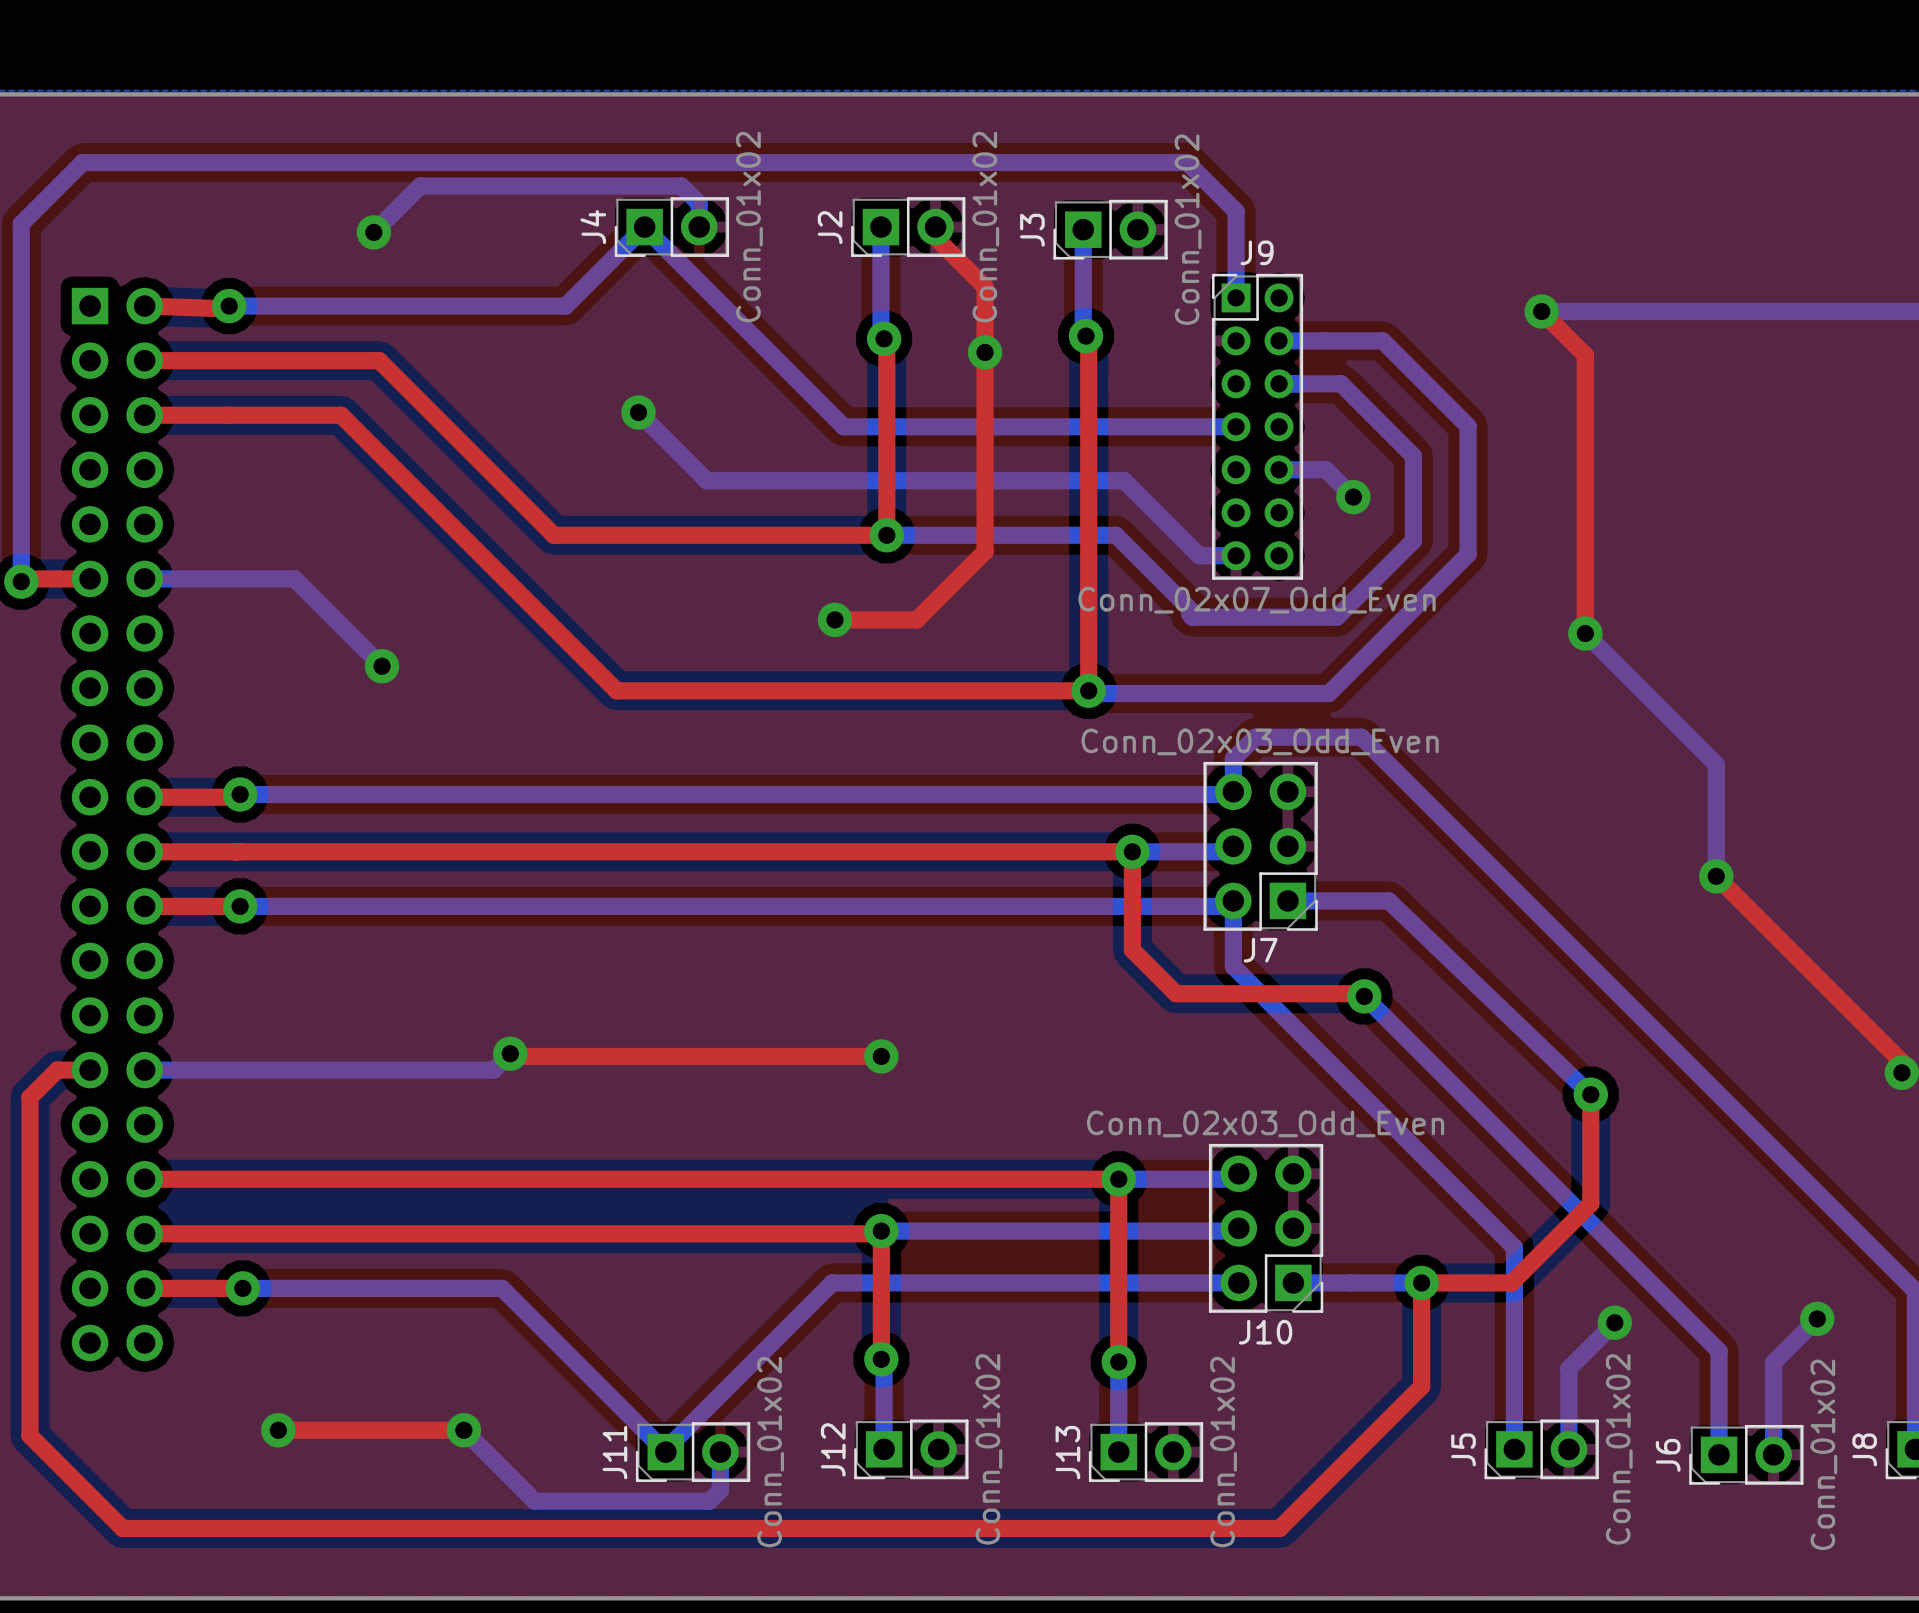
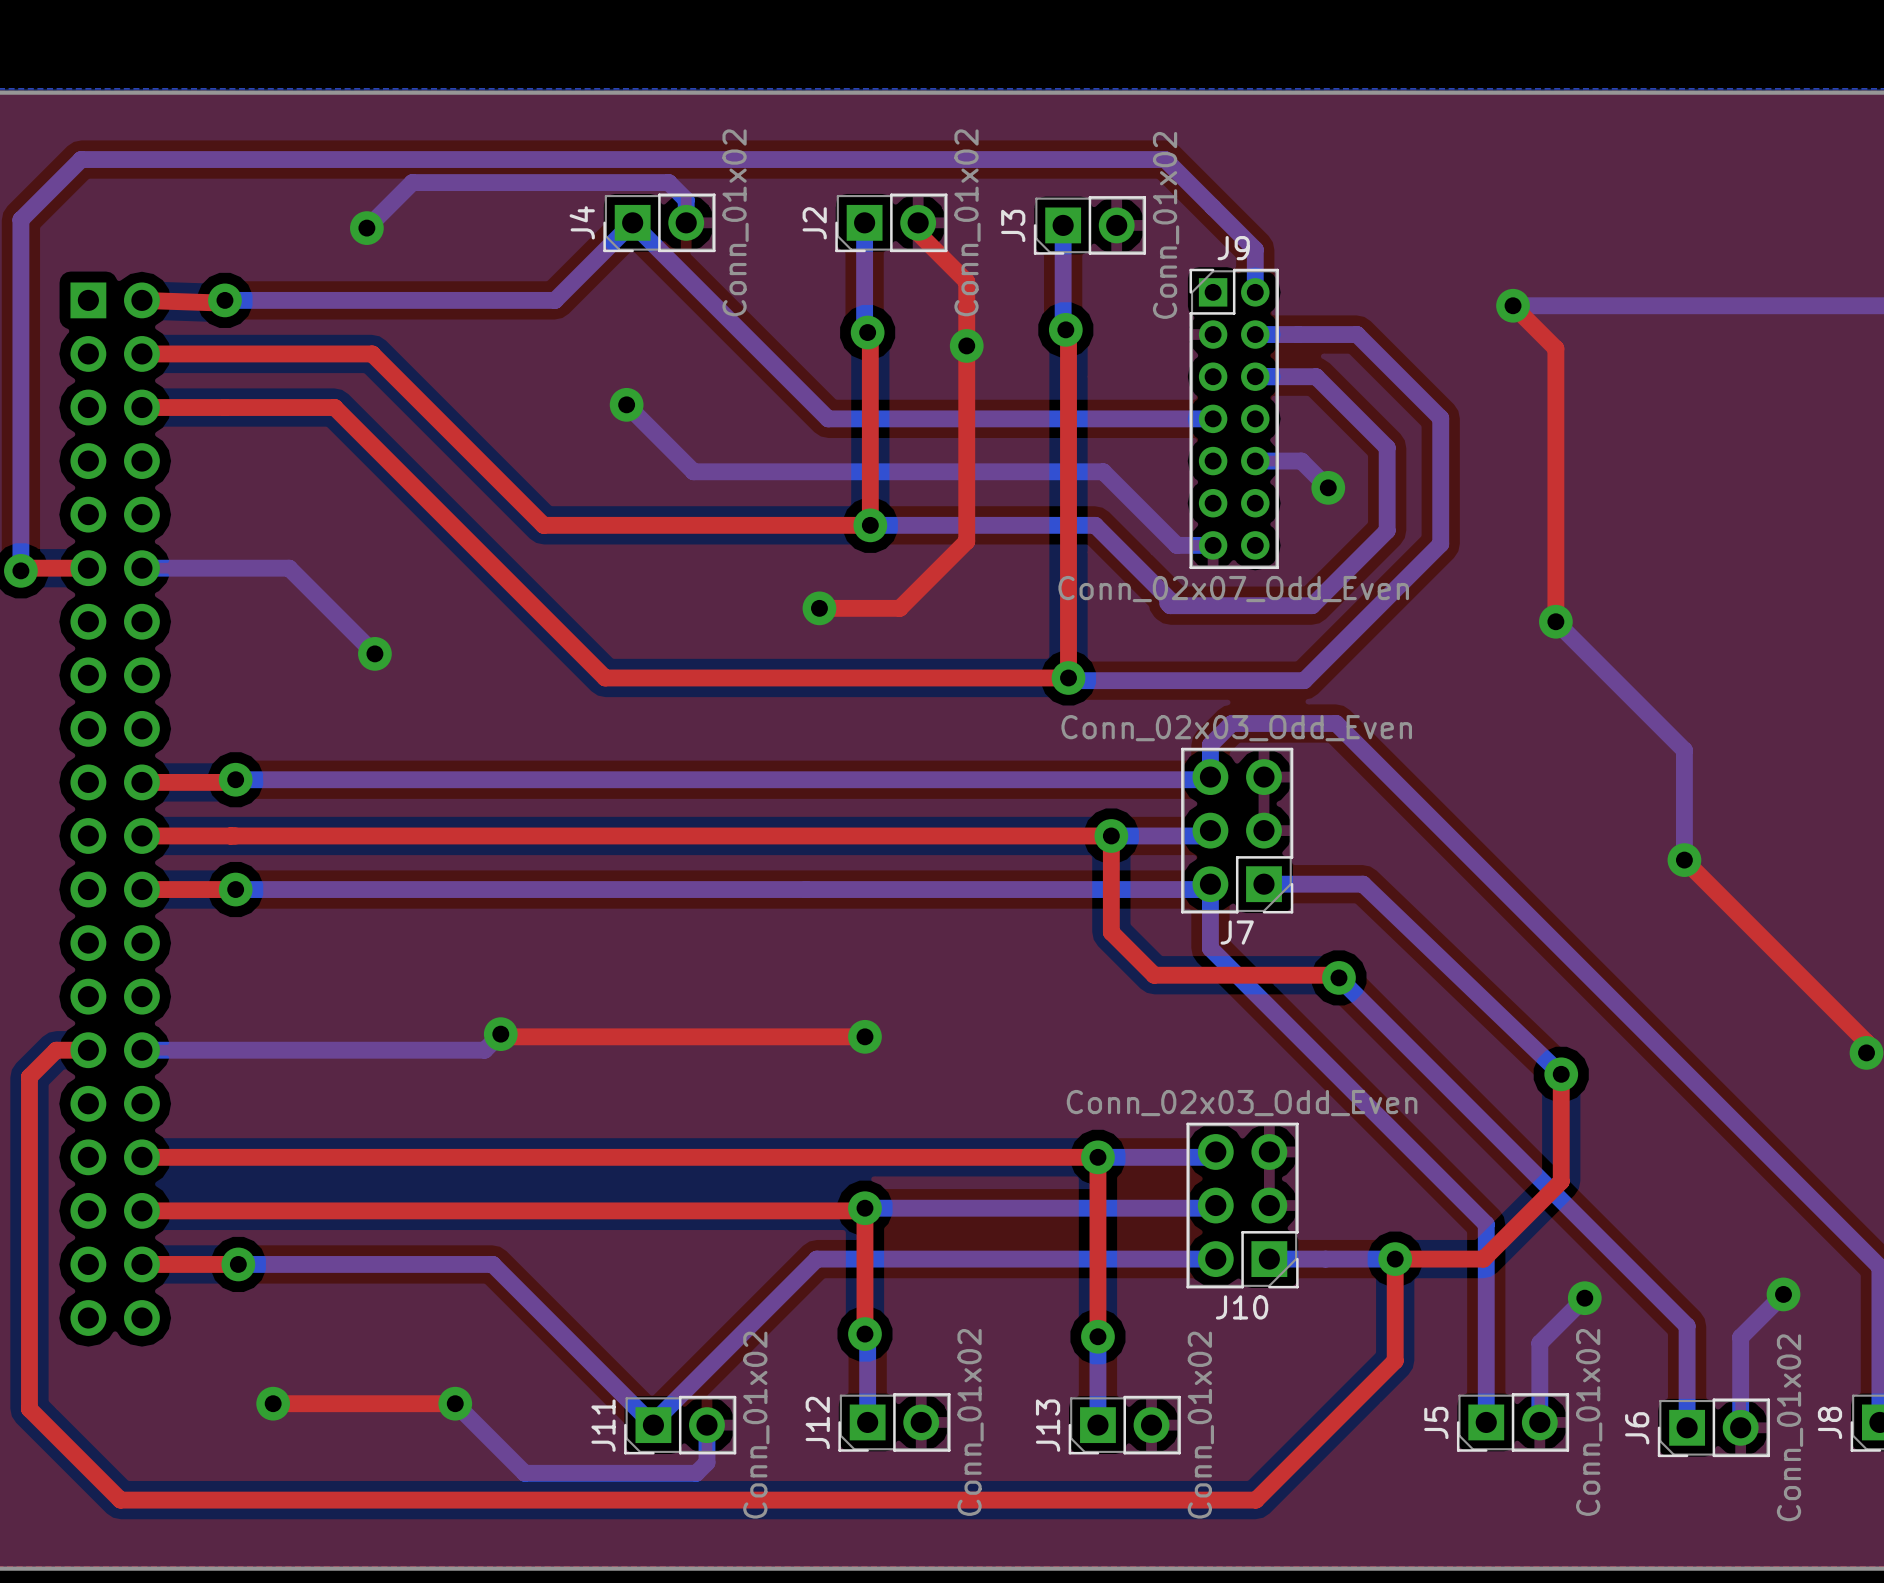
bottom track: (1236, 211) (1236, 297) -> (1213, 207) (1255, 249) (1255, 292)

